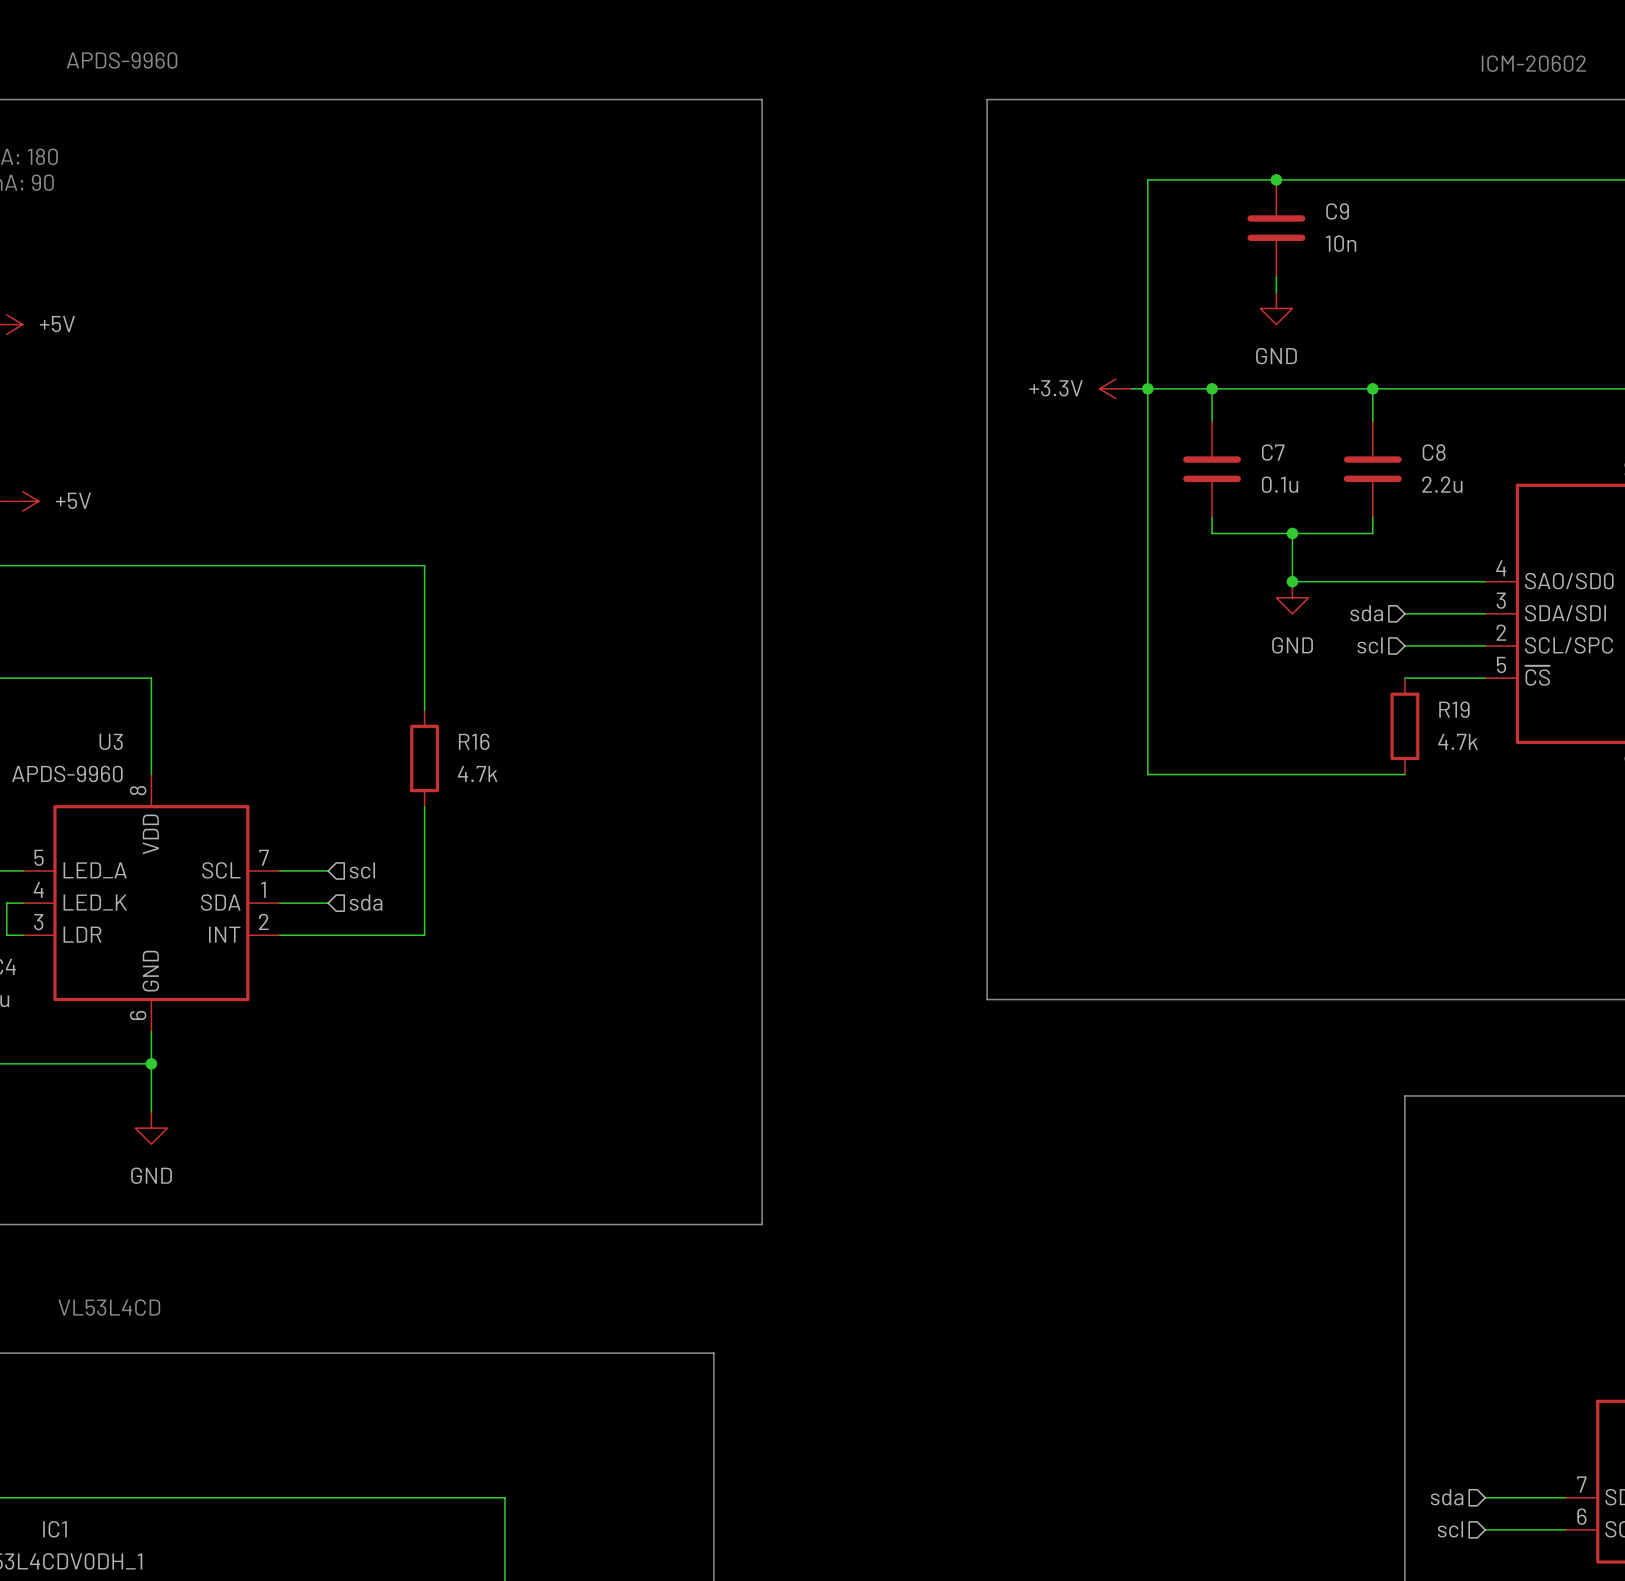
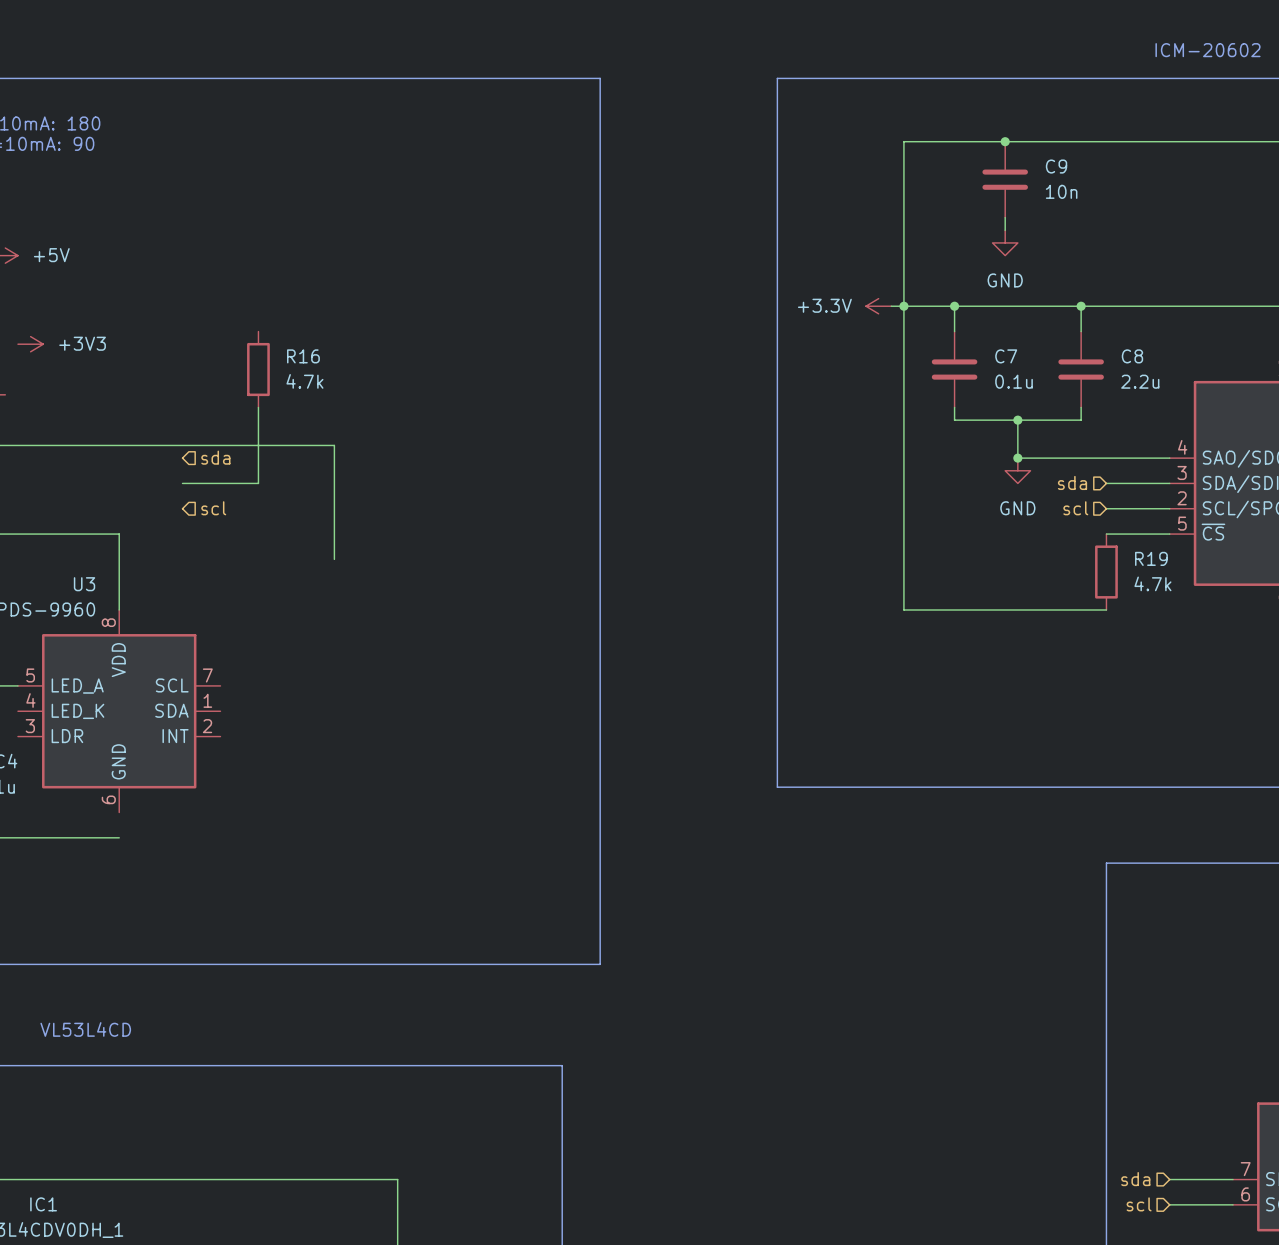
text: APDS-9960 (122, 60) -> none
power symbol: none -> +3V3 (30, 344)
power symbol: +5V (22, 501) -> none
wire: none -> (258, 407) (258, 483) (182, 483)
hierarchical label: none -> sda (215, 457)
R16 position: (424, 758) -> (258, 369)
wire: (424, 806) (424, 935) (279, 935) -> none
wire: (279, 870) (328, 870) -> none
hierarchical label position: scl (362, 870) -> scl (213, 508)
hierarchical label: sda (366, 902) -> none
wire: (22, 903) (6, 903) (6, 935) (22, 935) -> none
wire: (279, 903) (328, 903) -> none
wire: (151, 1031) (151, 1112) -> none
junction: (151, 1063) -> none
power symbol: GND (151, 1128) -> none

